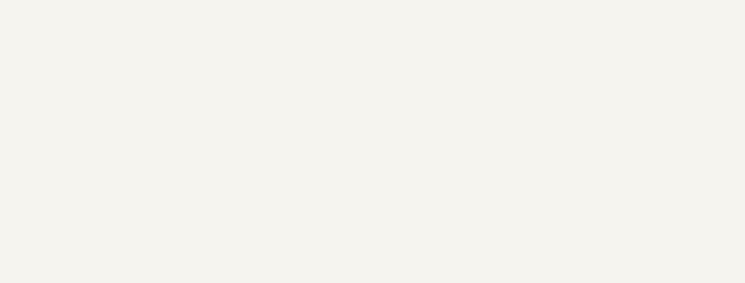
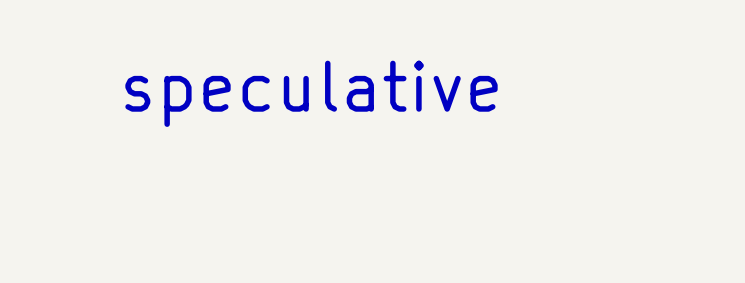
text: none -> speculative (311, 93)

